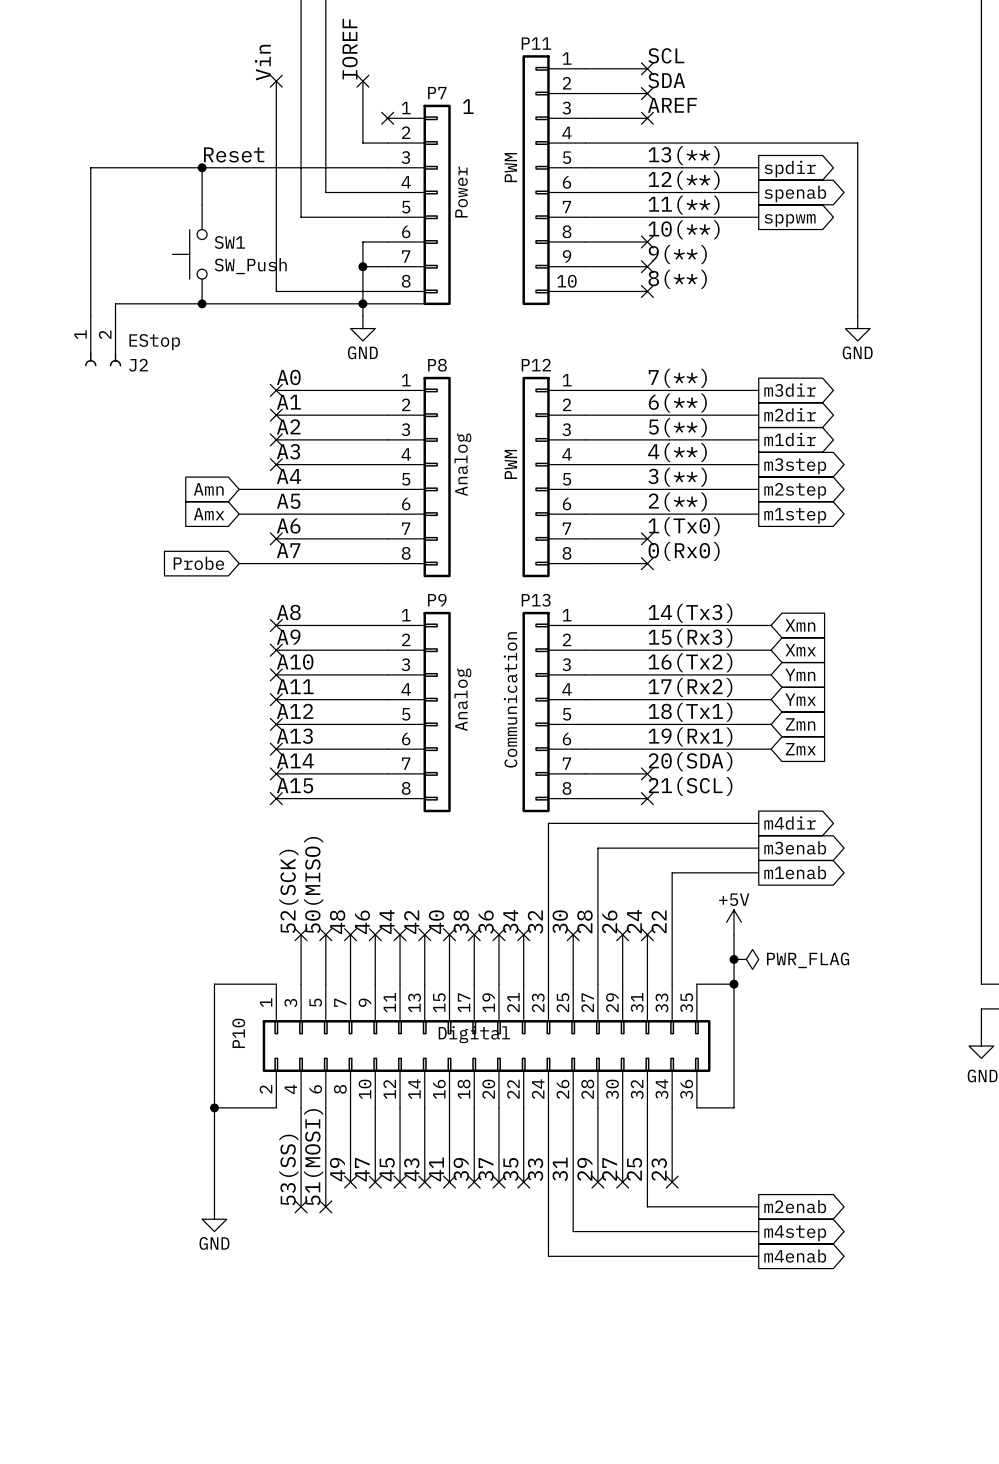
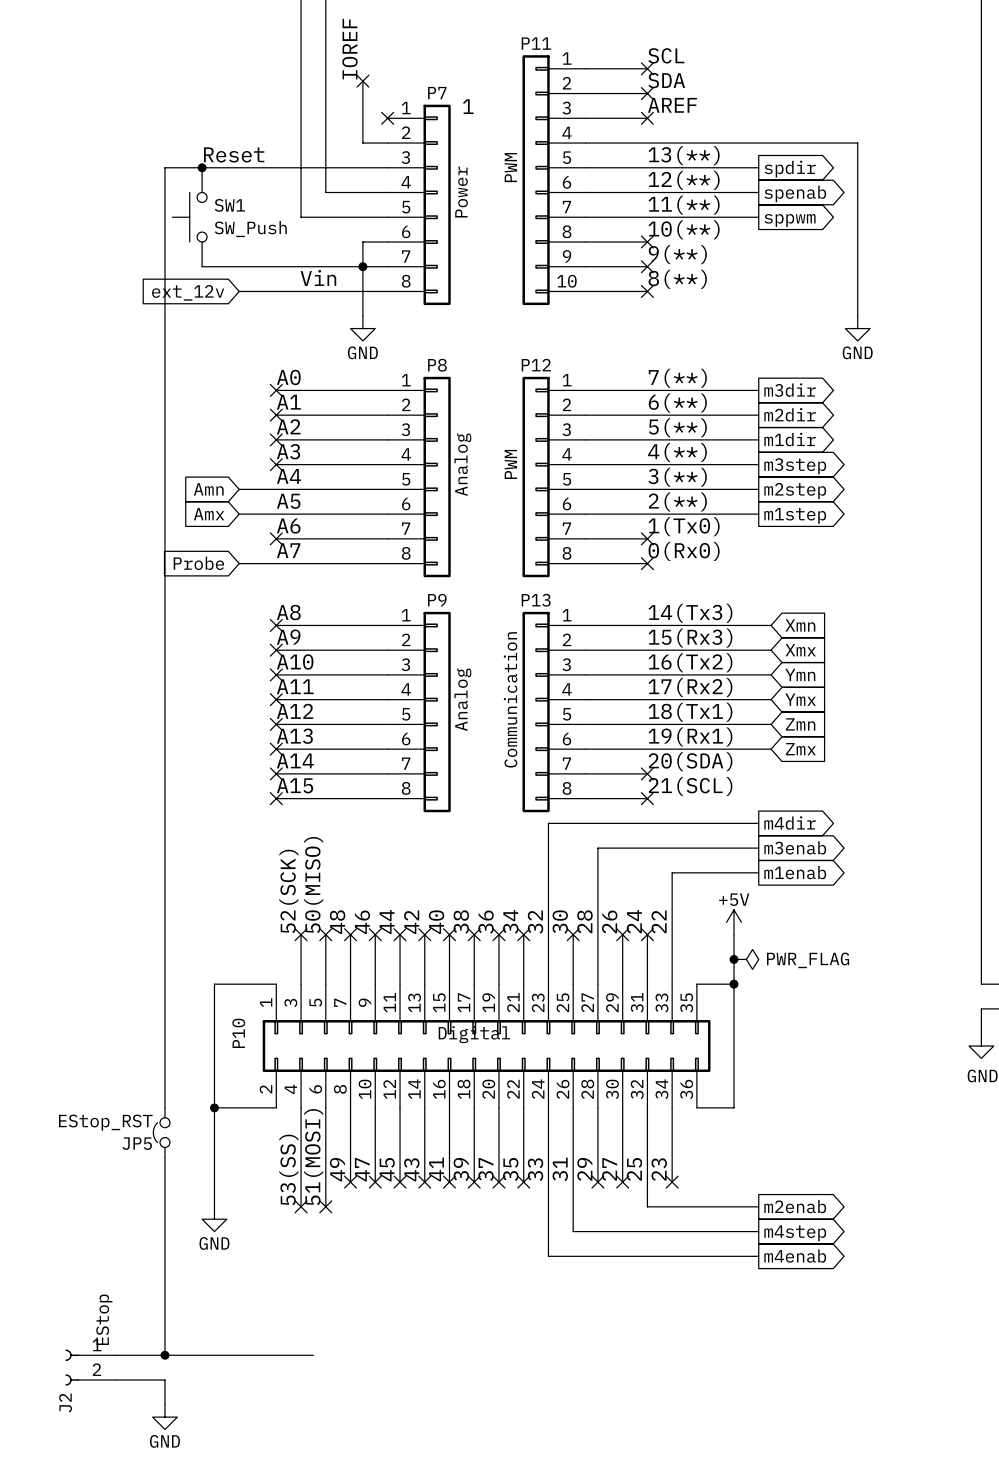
label rotation: 0° (262, 62) -> 90° clockwise (318, 277)
label position: Vin (262, 62) -> Vin (318, 277)
wire: (276, 81) (276, 291) -> (239, 291) (276, 291)
no-connect mark: (276, 81) -> none
wire: (164, 167) (90, 167) (90, 316) -> (164, 167) (164, 1107)
SW1 position: (189, 254) -> (189, 217)
wire: none -> (202, 266) (362, 266)
global label: none -> ext_12v (188, 292)
junction: (202, 303) -> none
junction: (362, 303) -> none
wire: (424, 303) (115, 303) (115, 316) -> none
J2 position: (103, 341) -> (90, 1367)
J2 value position: EStop (154, 342) -> EStop (104, 1319)
J2 rotation: 0° (103, 359) -> 90° clockwise (72, 1367)
JP5: none -> EStop_RST (161, 1132)
wire: none -> (164, 1157) (164, 1355)
wire: none -> (115, 1355) (313, 1355)
junction: none -> (164, 1355)
wire: none -> (115, 1380) (164, 1380) (164, 1404)
power symbol: none -> GND (164, 1417)

